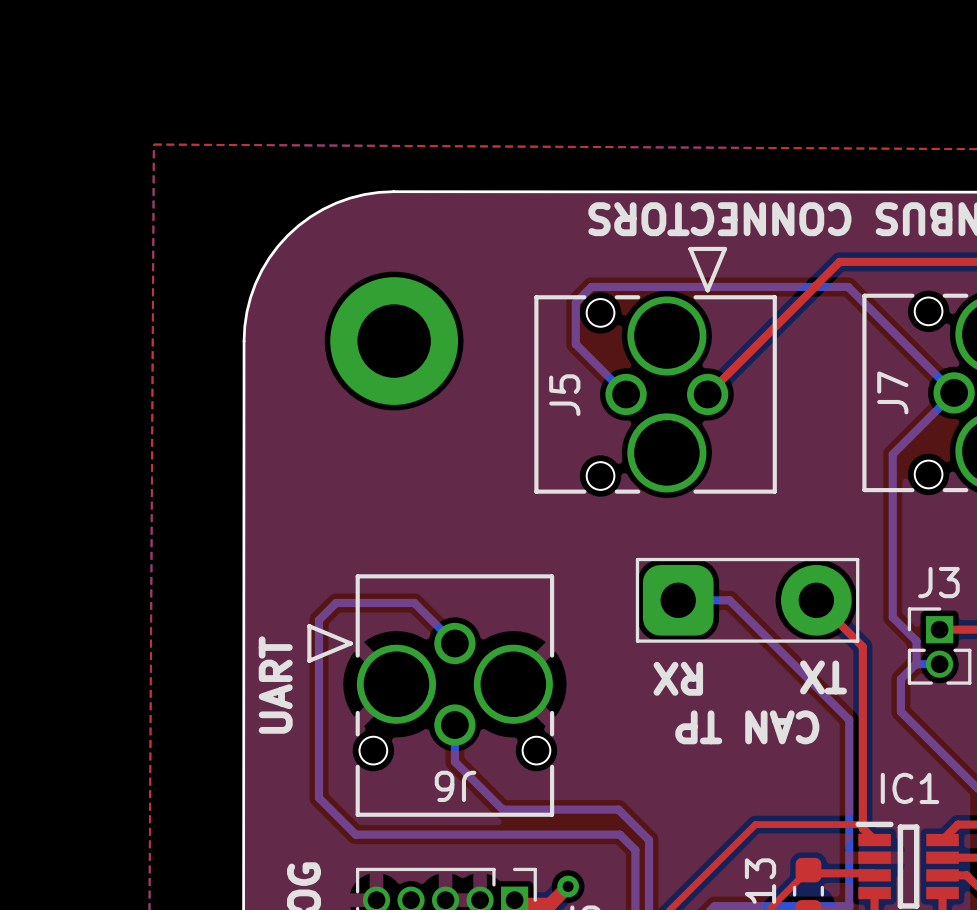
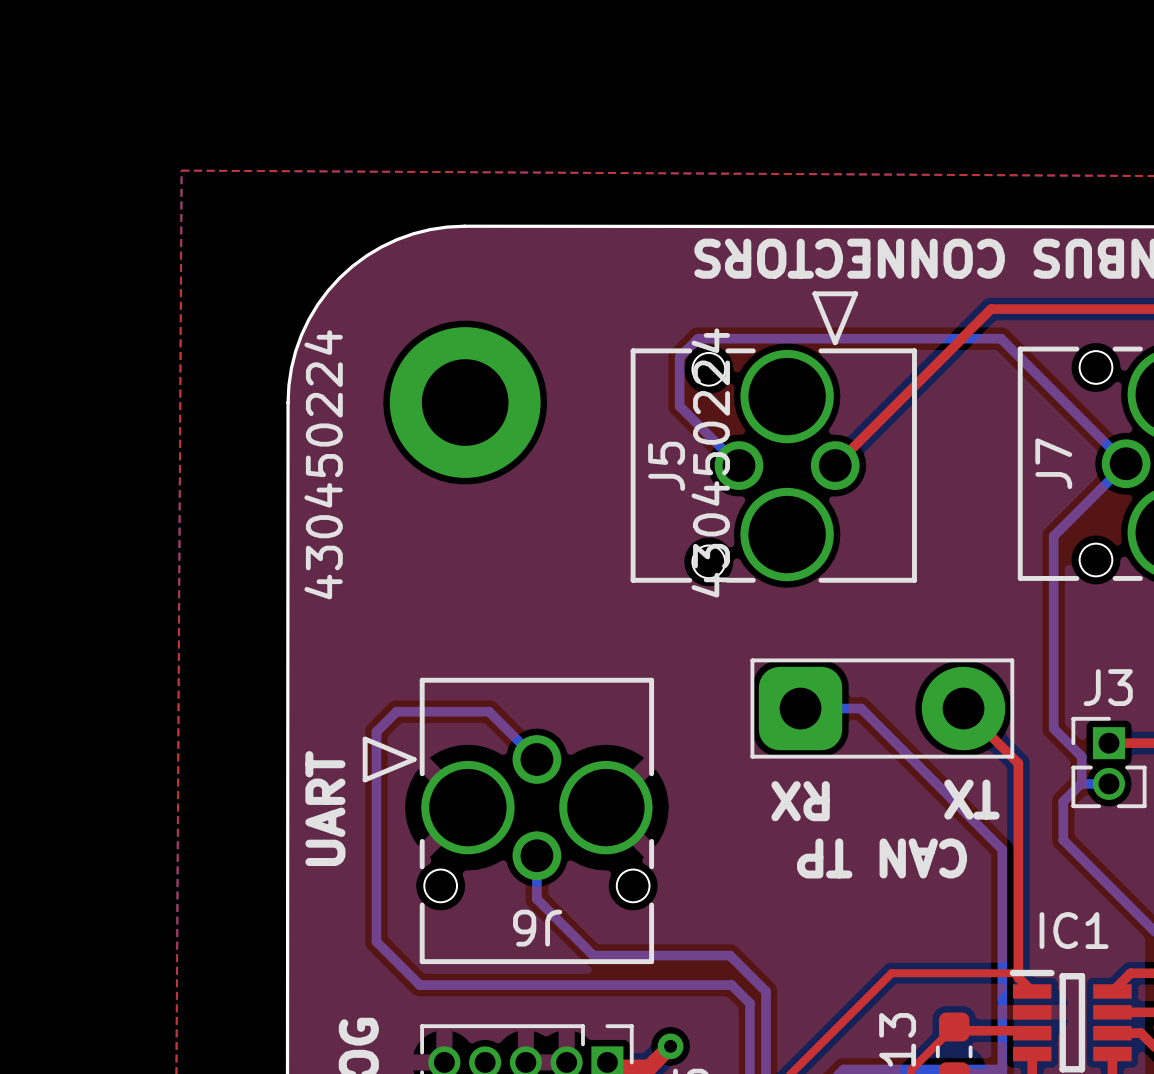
J7 text: none -> 430450224 (710, 462)
J5 text: none -> 430450224 (323, 464)

